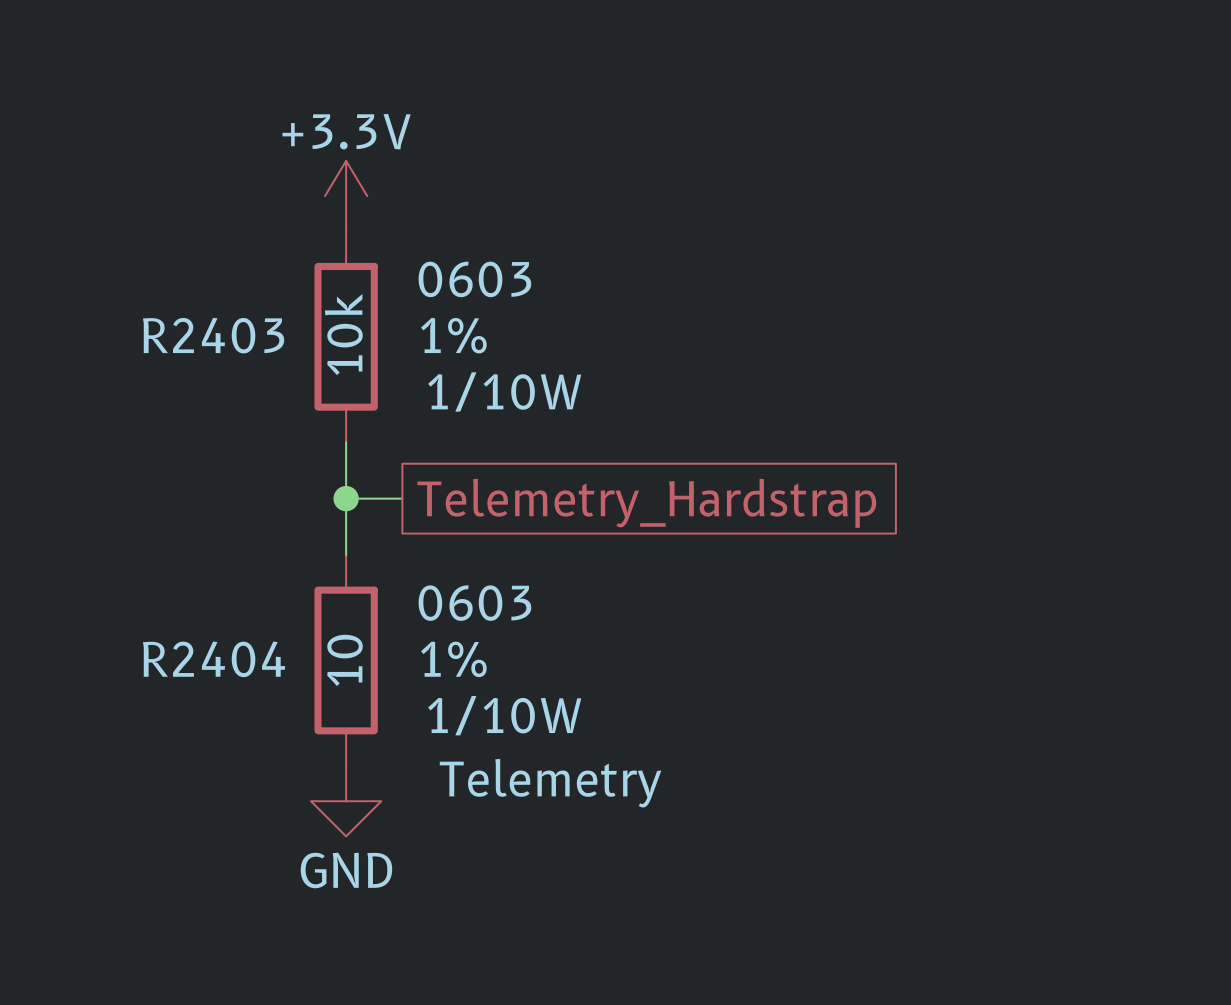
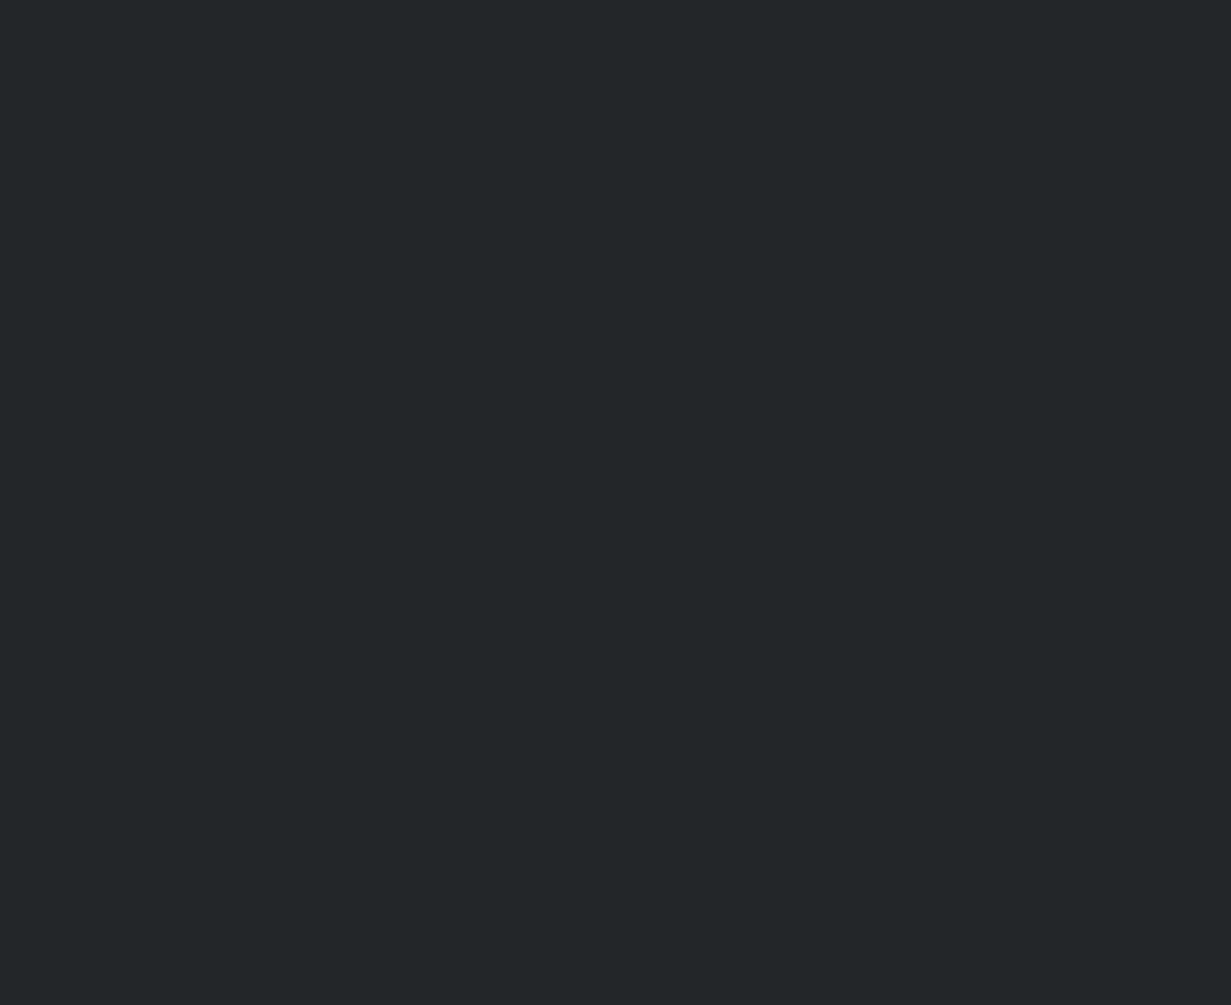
power symbol: +3.3V (346, 196) -> none
R2403: 10k (346, 336) -> none
wire: (346, 442) (346, 554) -> none
wire: (346, 498) (402, 498) -> none
junction: (346, 498) -> none
global label: Telemetry_Hardstrap (646, 503) -> none
R2404: 10 (346, 660) -> none
power symbol: GND (346, 801) -> none

